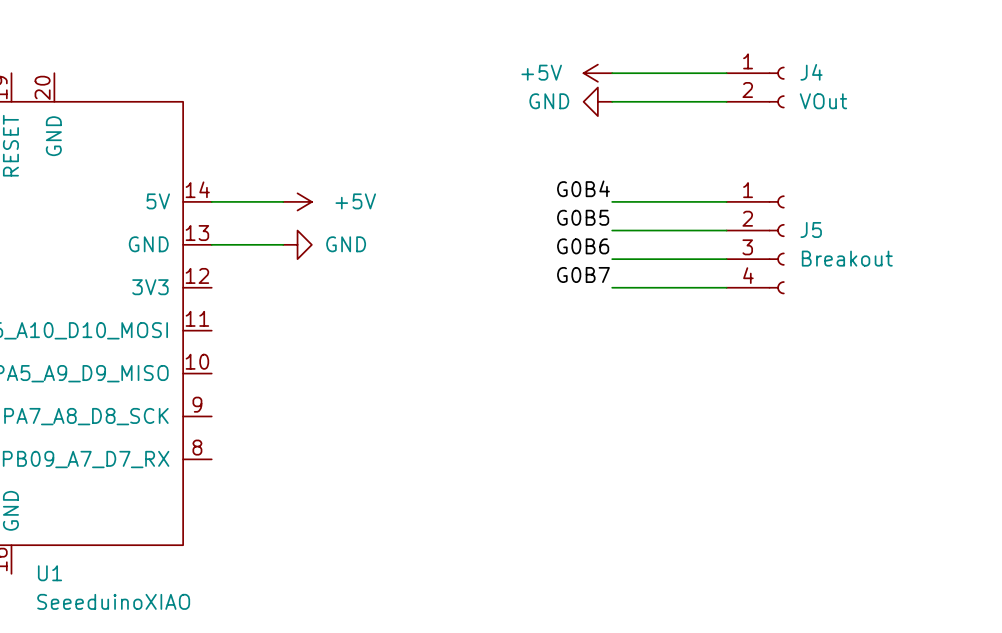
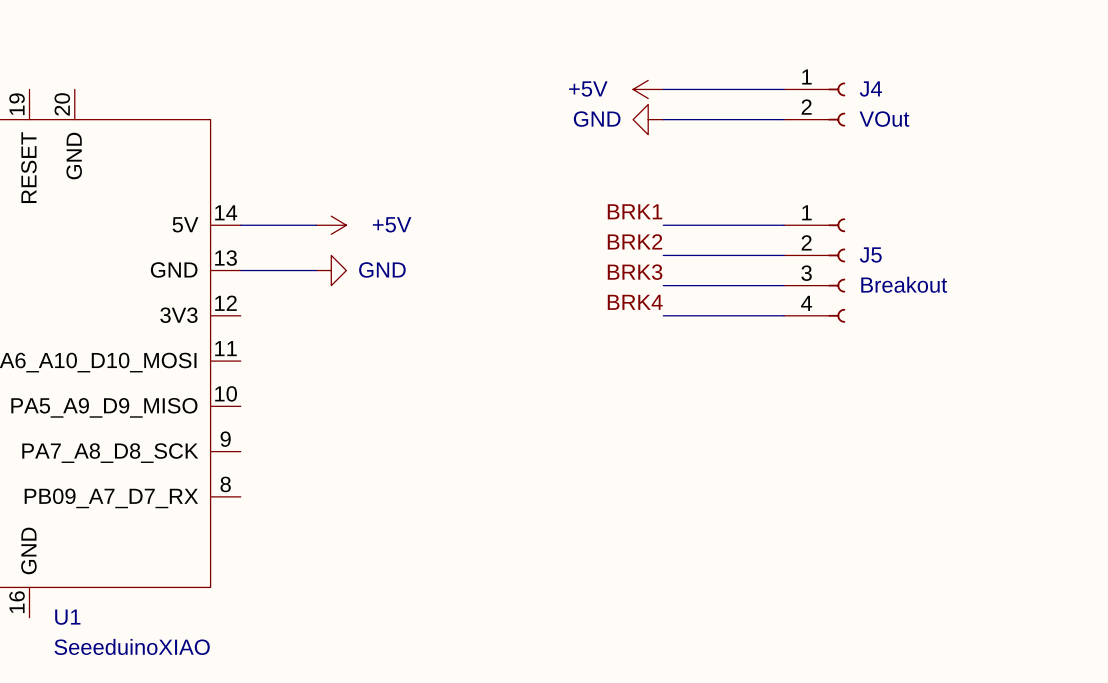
label: G0B4 (583, 188) -> BRK1 (635, 211)
label: G0B5 (583, 217) -> BRK2 (634, 241)
label: G0B6 (583, 246) -> BRK3 (635, 272)
label: G0B7 (583, 274) -> BRK4 (635, 302)

